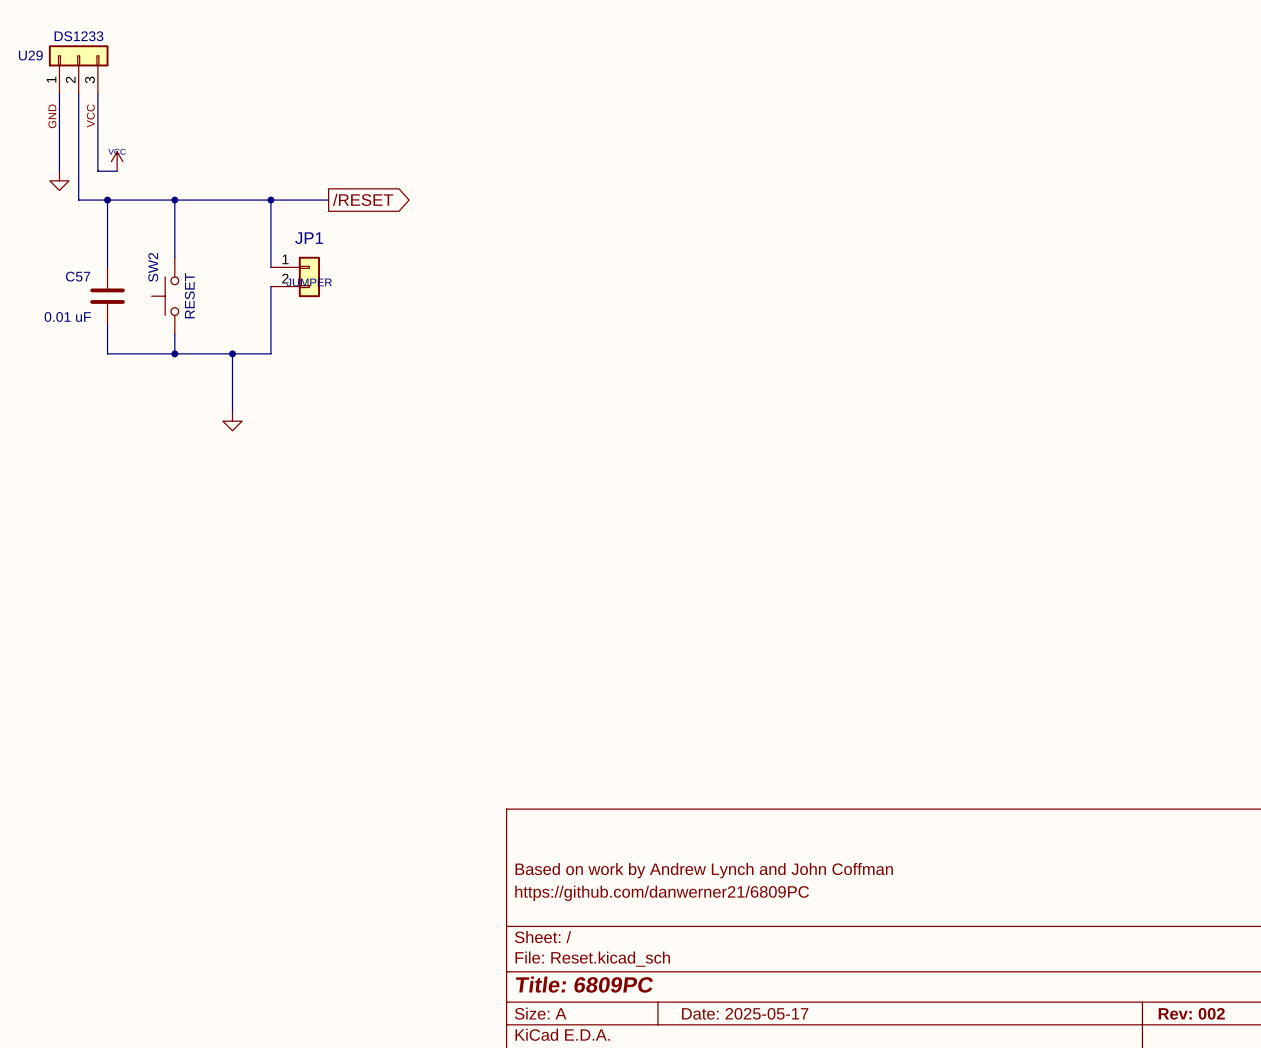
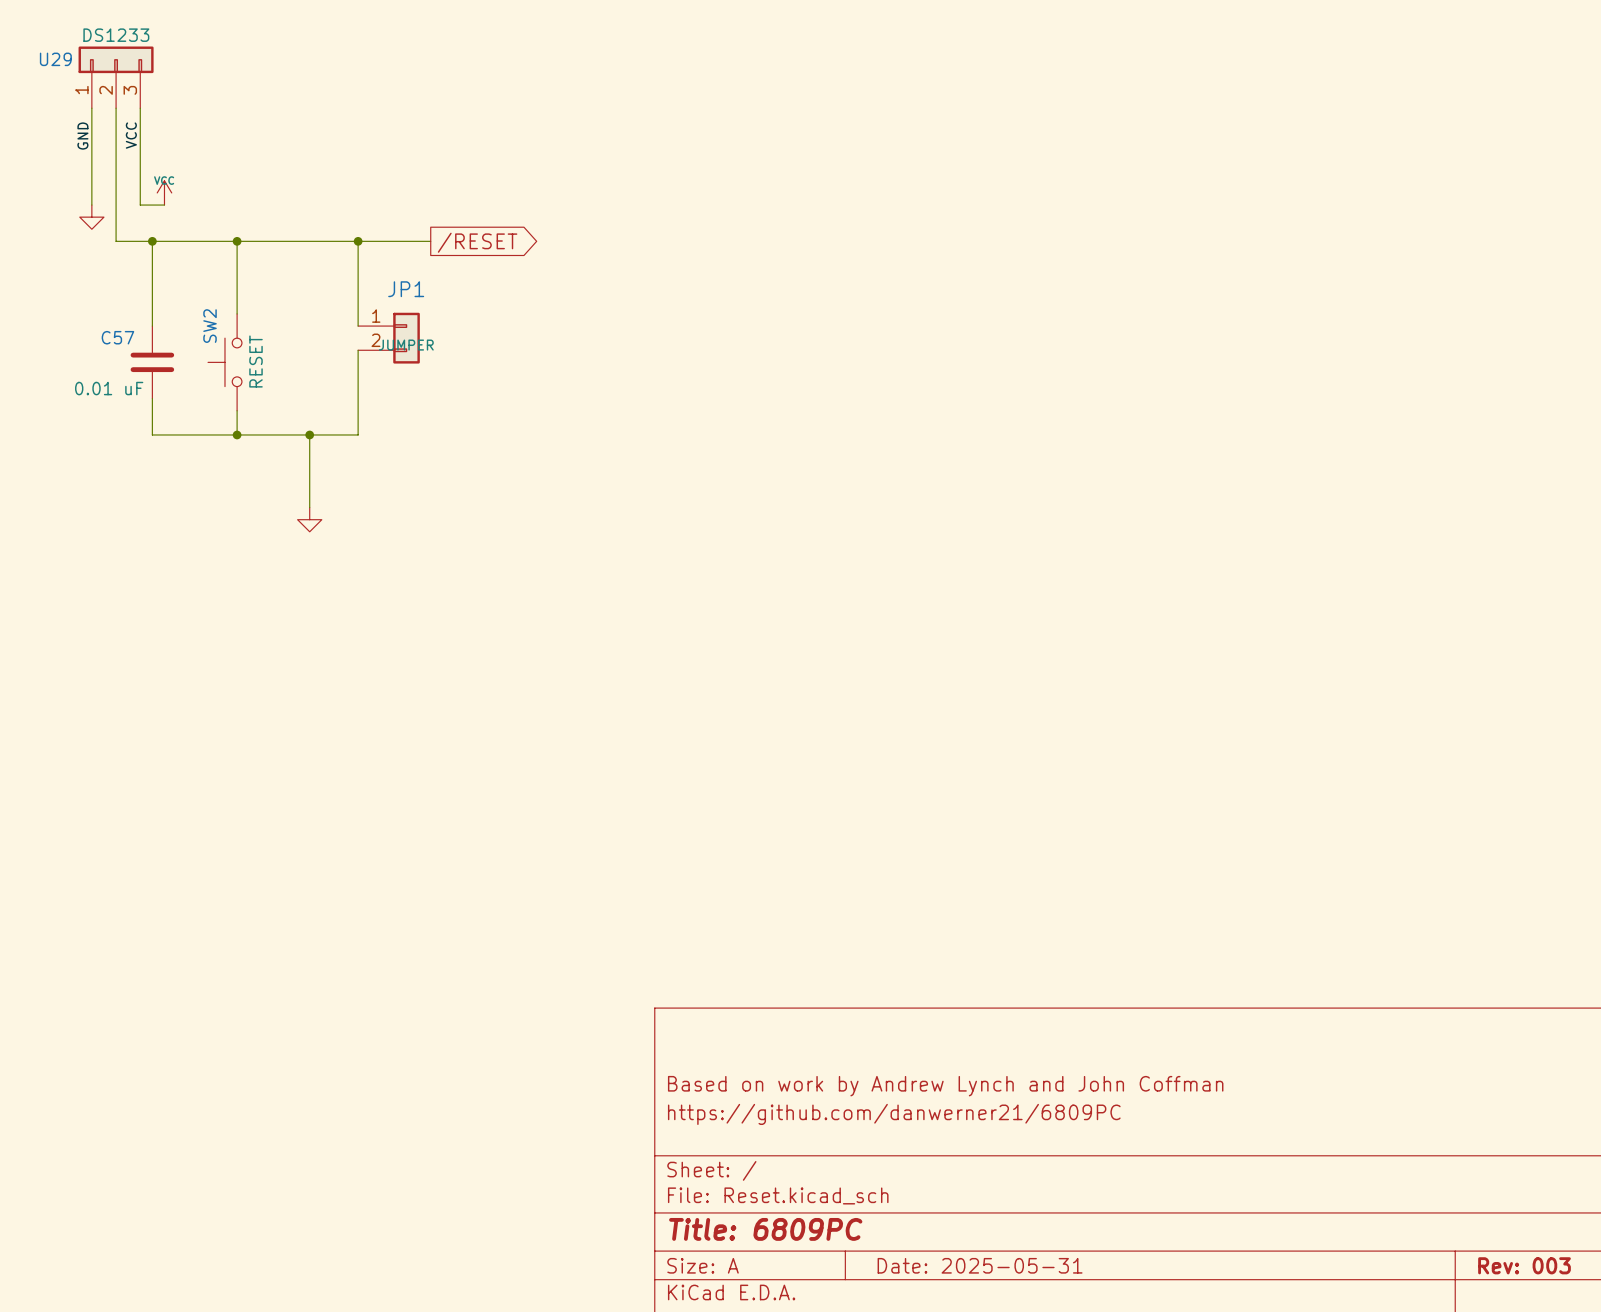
title block: Date: 2025-05-17 (745, 1013) -> Date: 2025-05-31 (980, 1265)
title block: Rev: 002 (1191, 1013) -> Rev: 003 (1524, 1265)

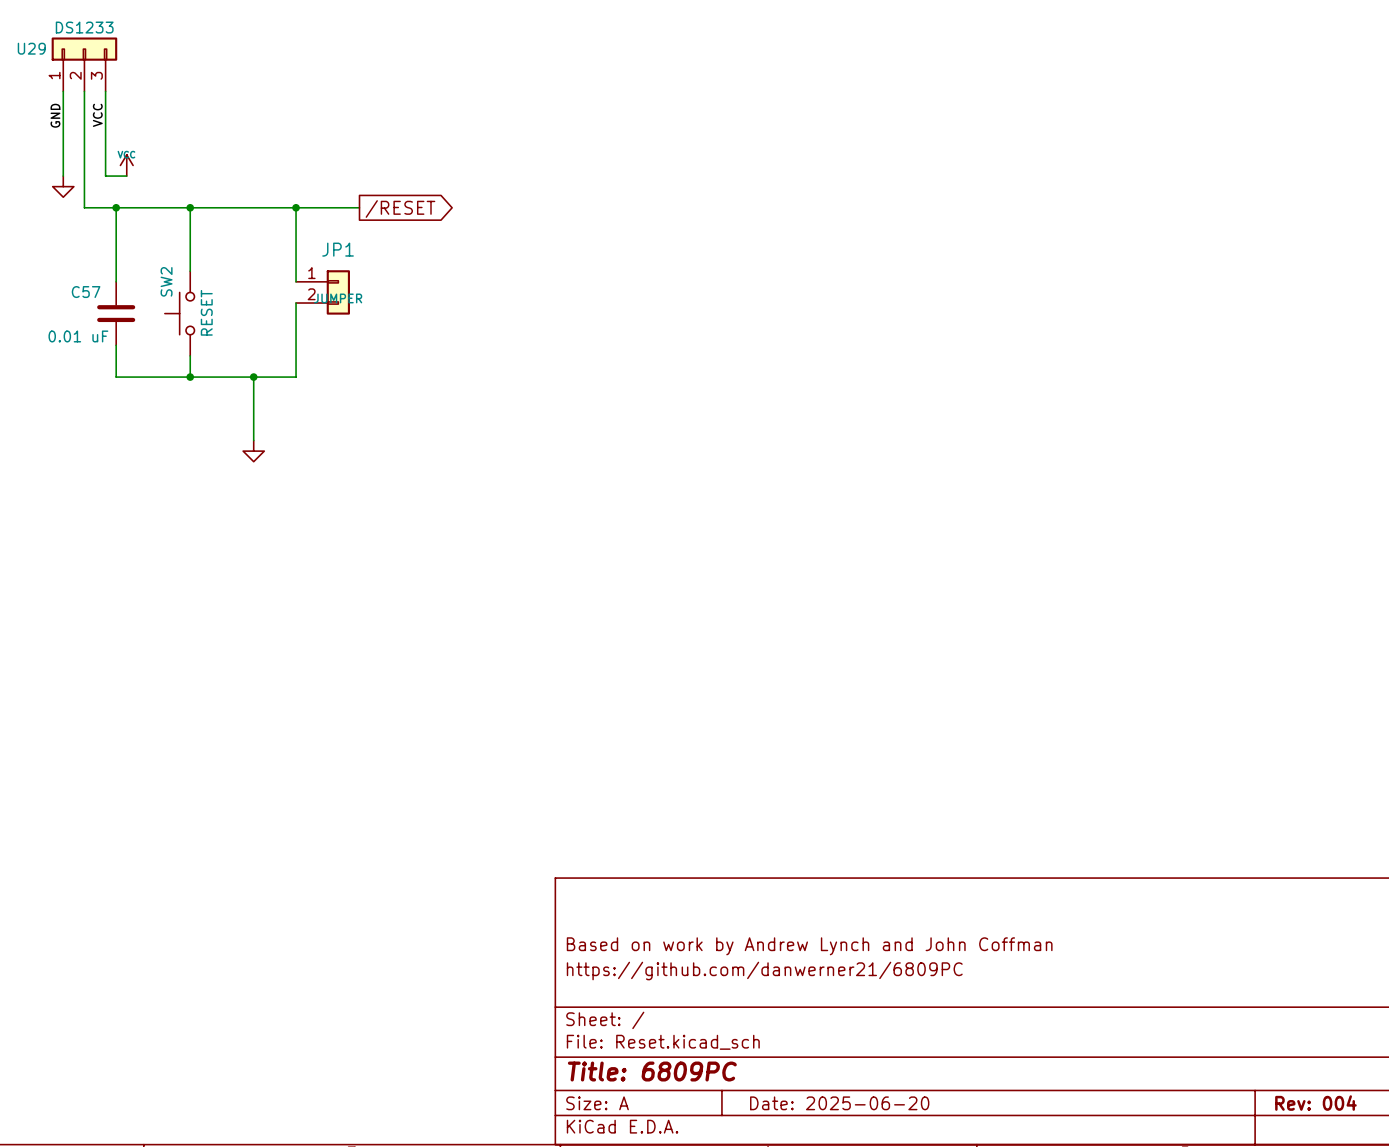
title block: Date: 2025-05-31 (980, 1265) -> Date: 2025-06-20 (839, 1103)
title block: Rev: 003 (1524, 1265) -> Rev: 004 (1315, 1103)

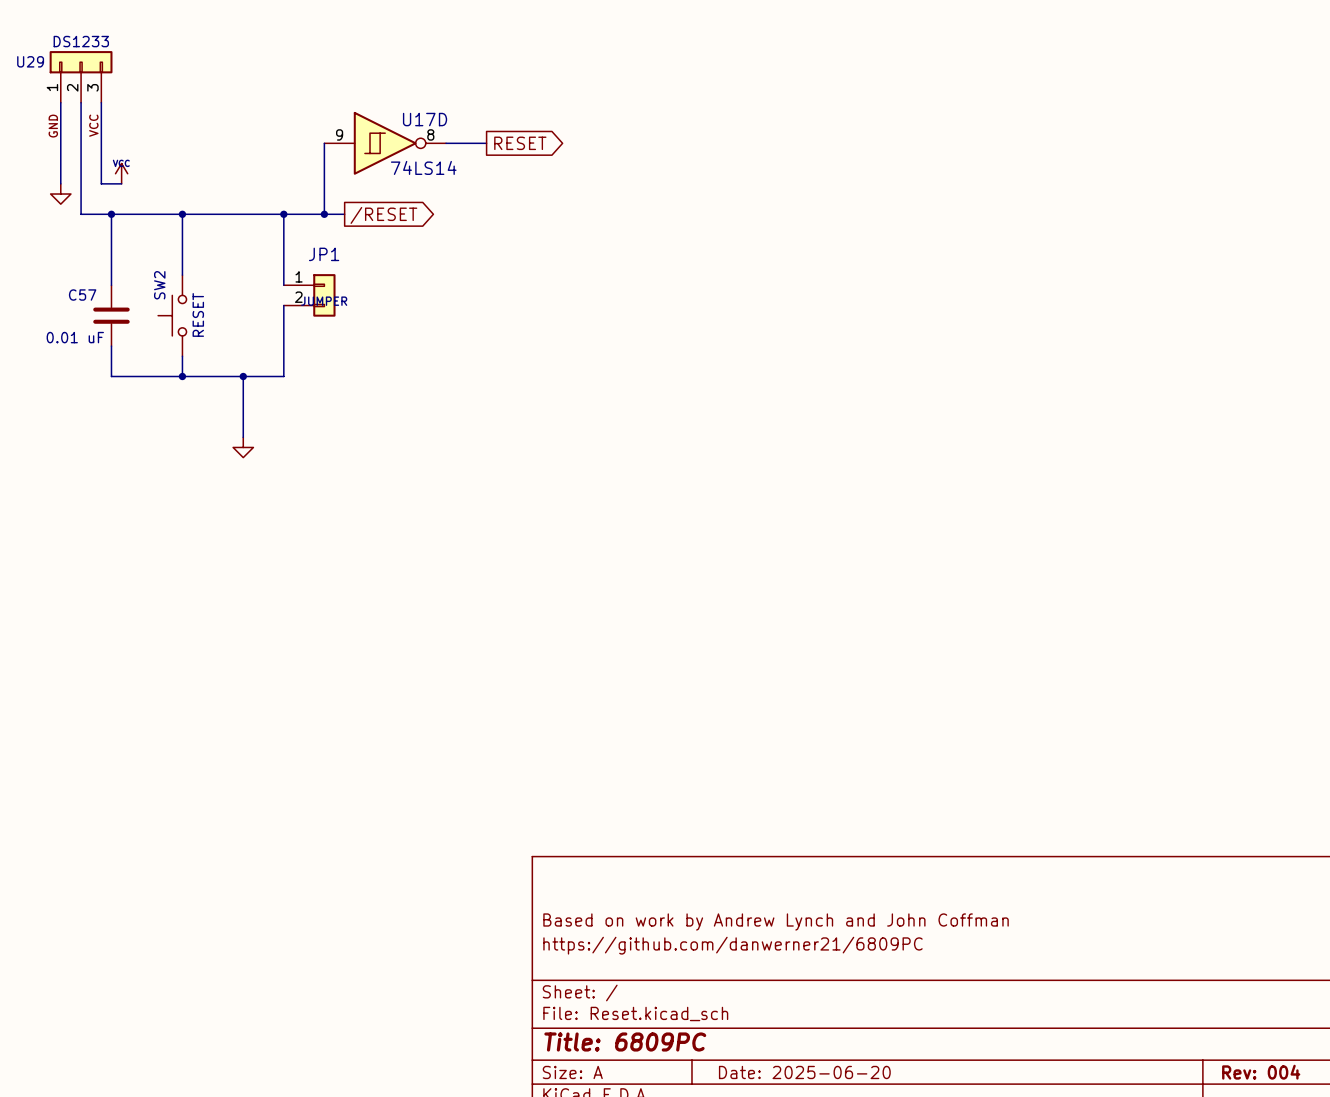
wire: none -> (324, 143) (324, 214)
U17D: none -> 74LS14 (385, 143)
wire: none -> (446, 143) (486, 143)
global label: none -> RESET (520, 143)
junction: none -> (324, 214)

